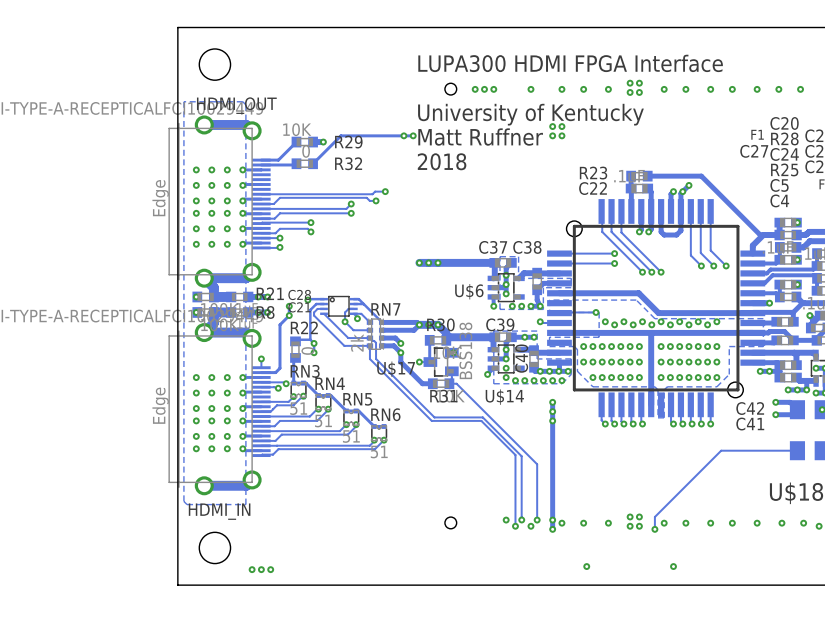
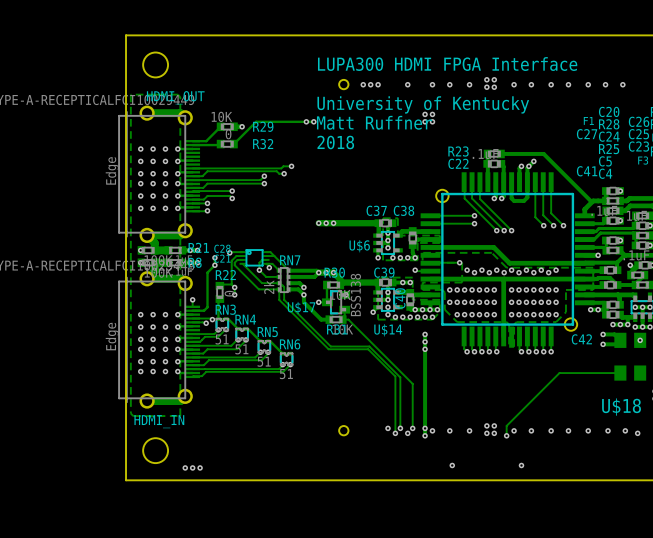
C41 name position: C41 (750, 424) -> C41 (587, 171)

